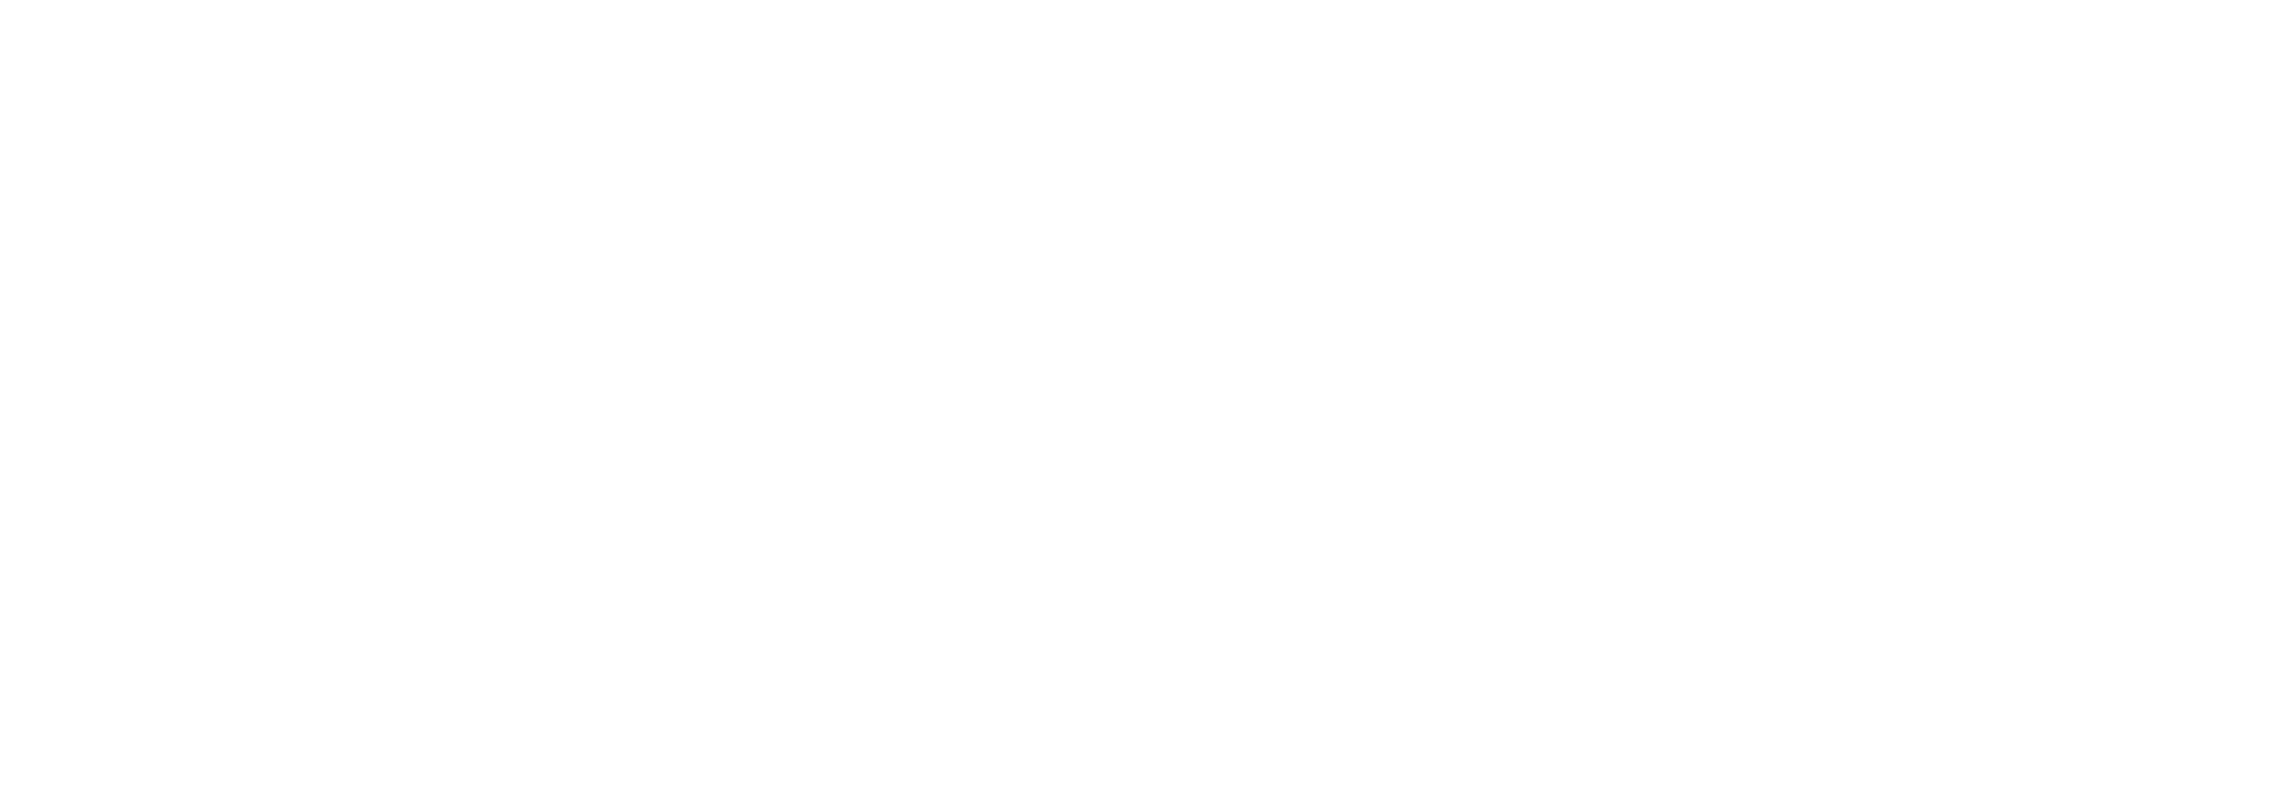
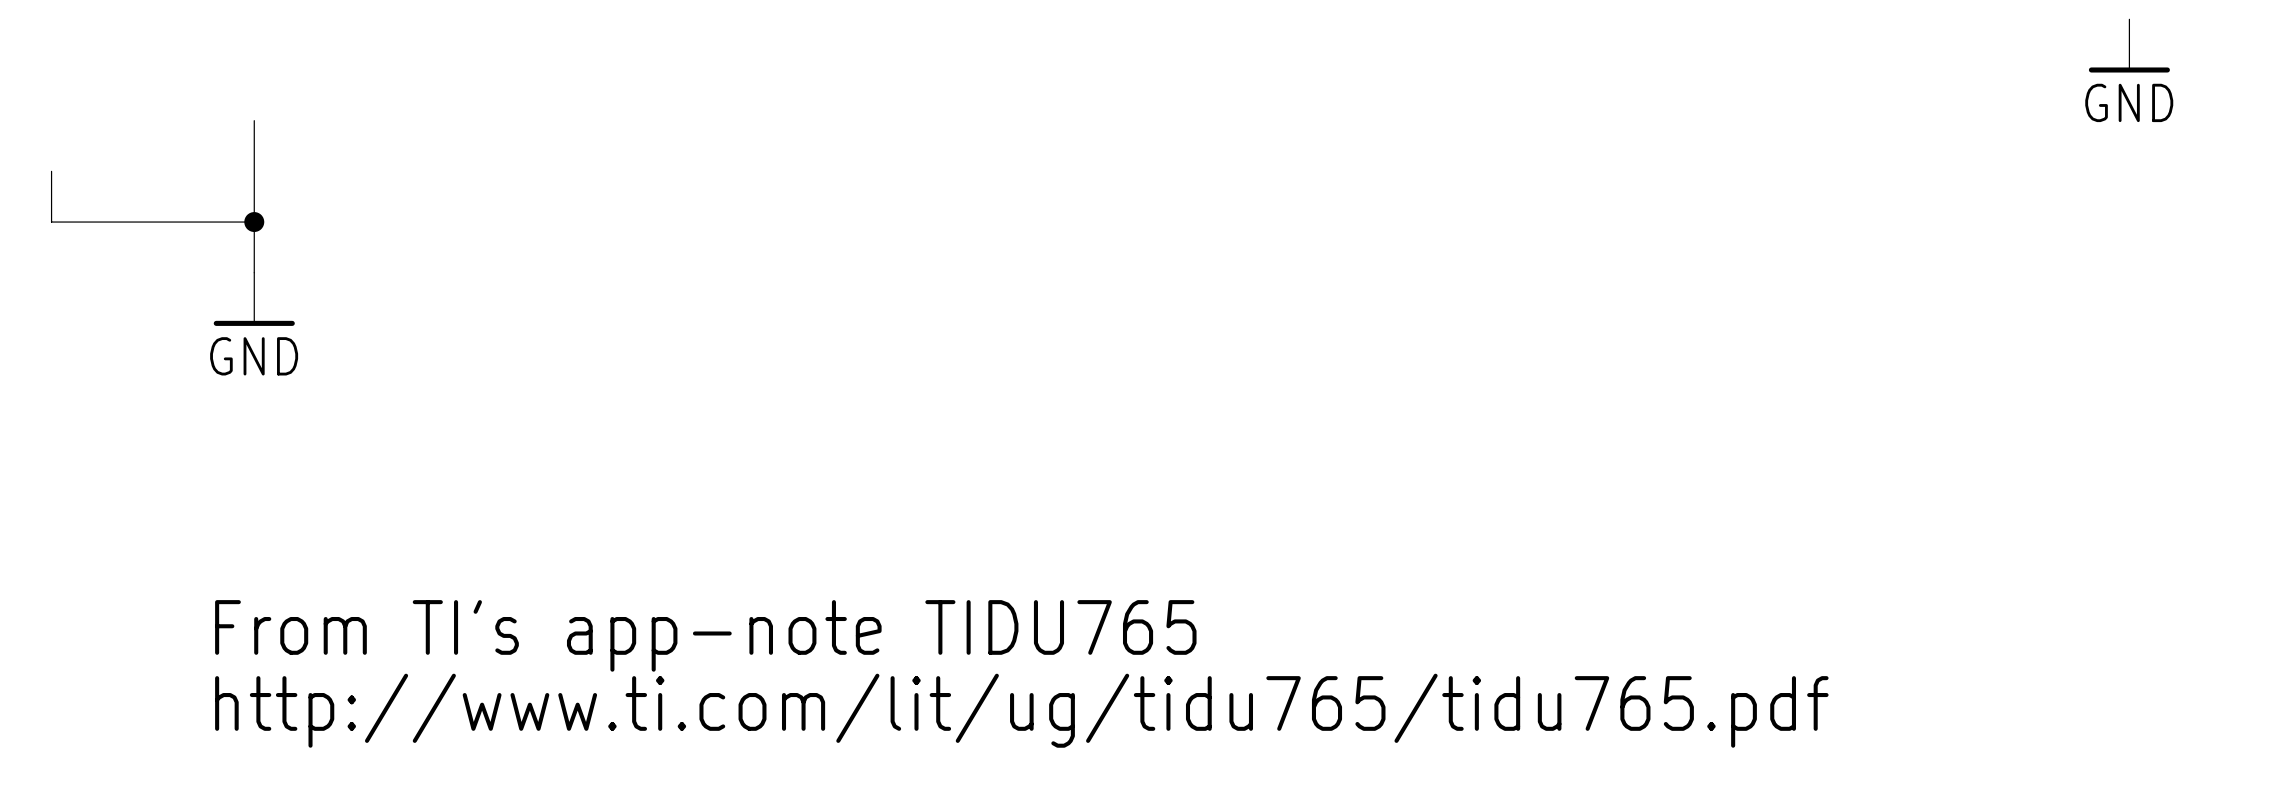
power symbol: none -> GND (2129, 45)
wire: none -> (254, 120) (254, 272)
wire: none -> (51, 171) (51, 222) (254, 222)
junction: none -> (254, 222)
power symbol: none -> GND (254, 299)
text: none -> From TI's app-note TIDU765 (705, 635)
text: none -> http://www.ti.com/lit/ug/tidu765/tidu765.pdf (1021, 710)

